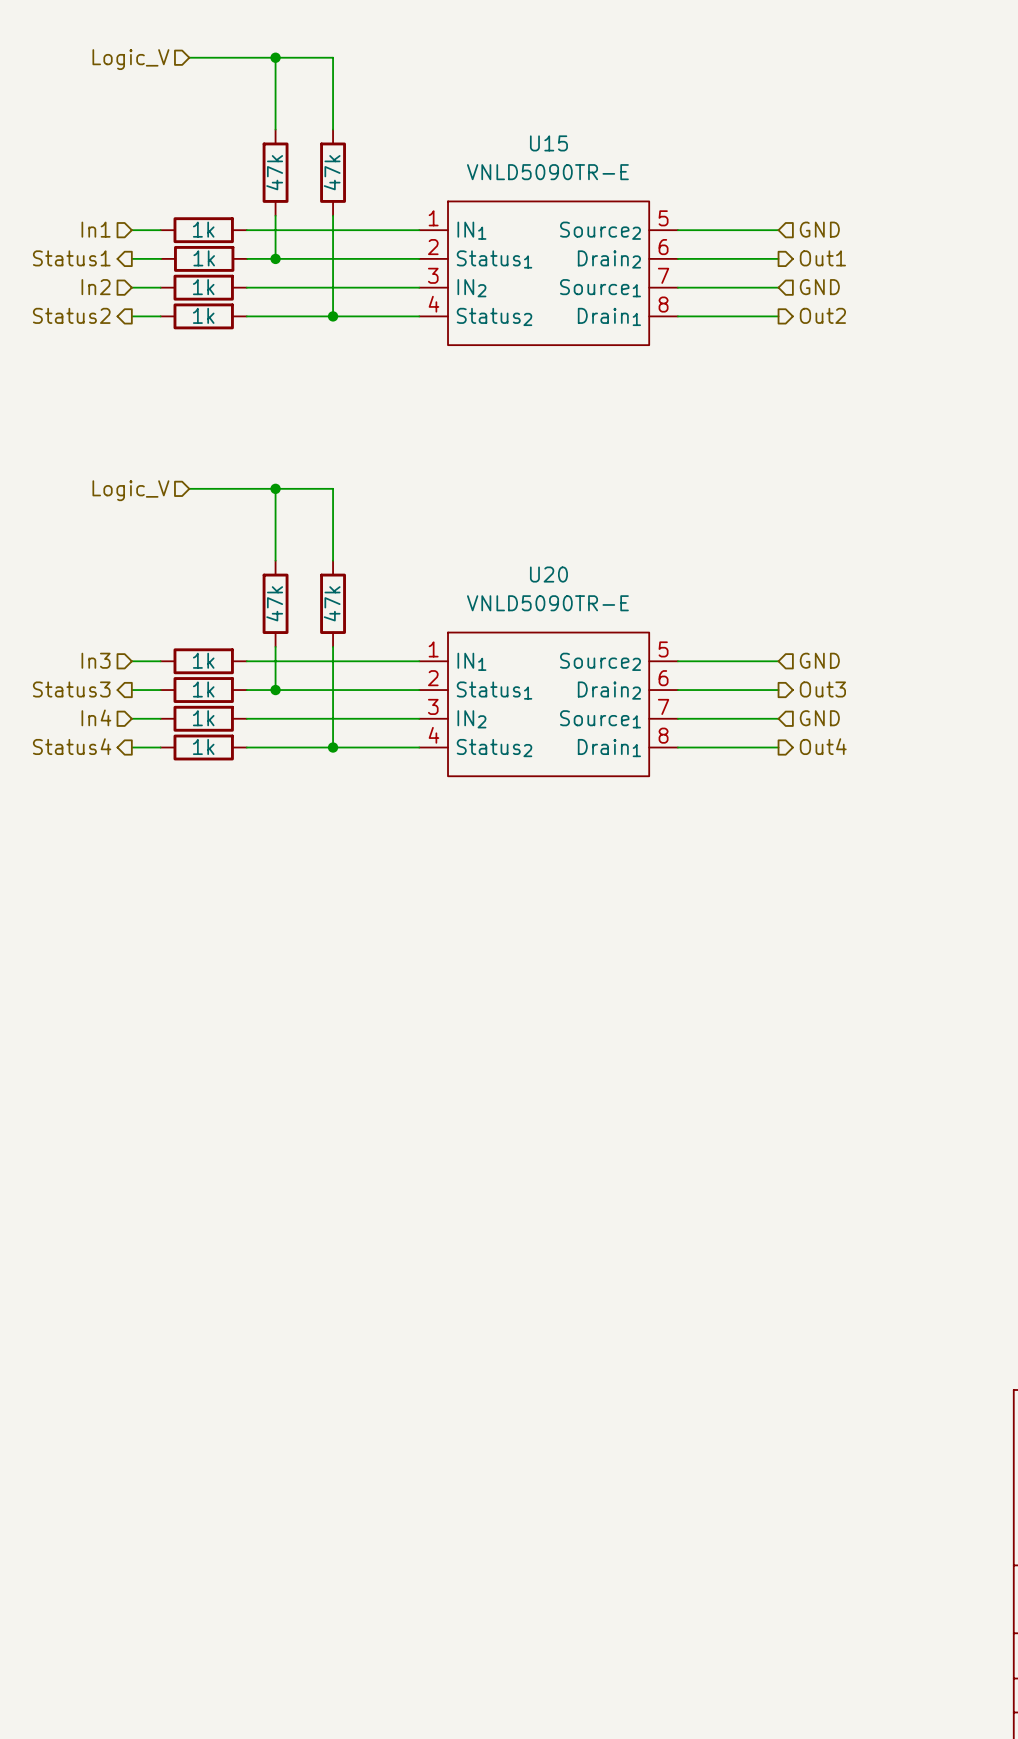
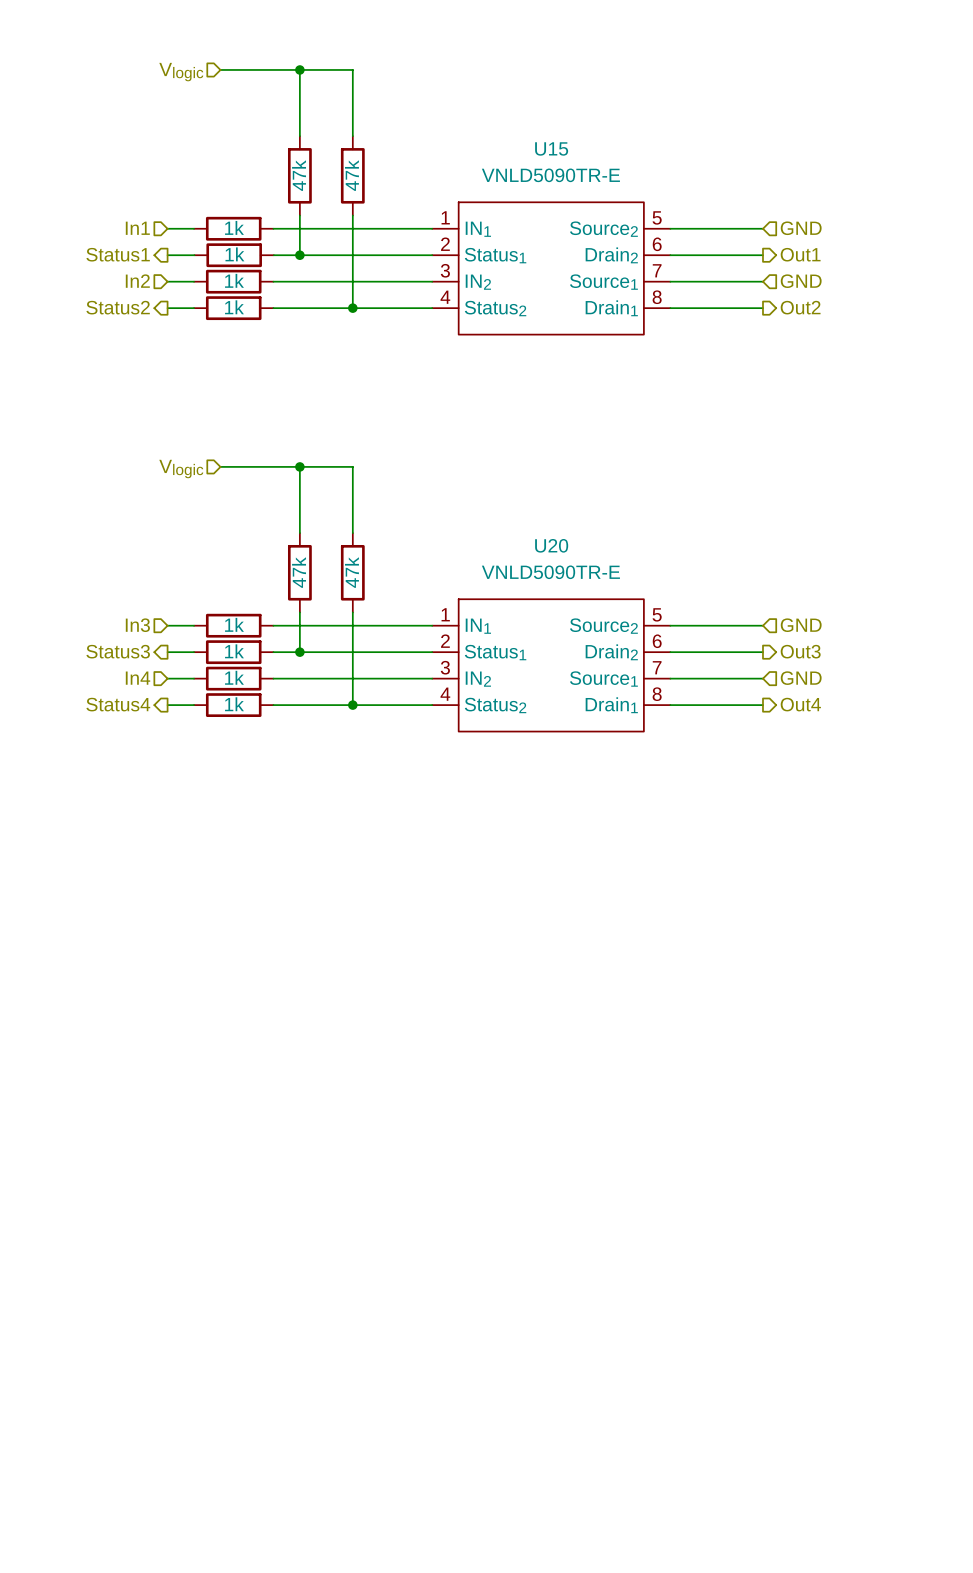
hierarchical label: Logic_V (130, 59) -> Vlogic (181, 72)
hierarchical label: Logic_V (130, 490) -> Vlogic (181, 469)

